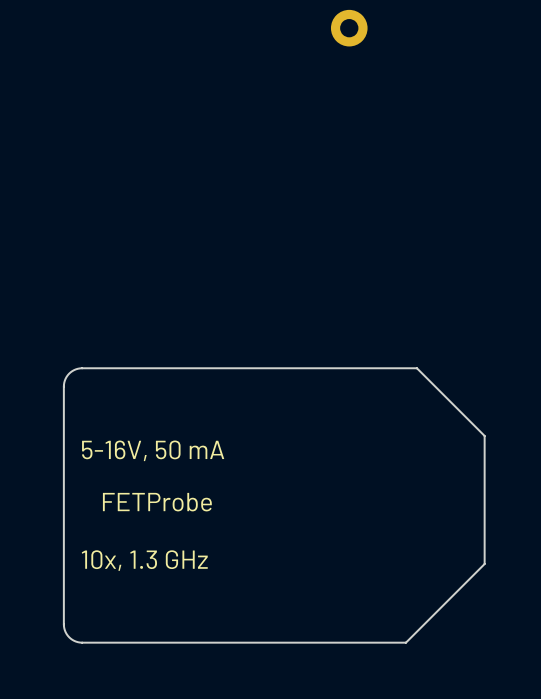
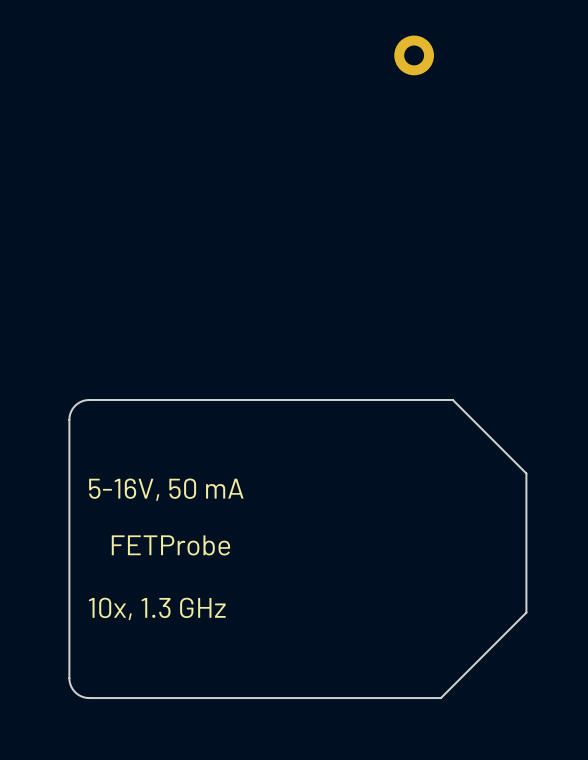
part position: (349, 28) -> (414, 55)

